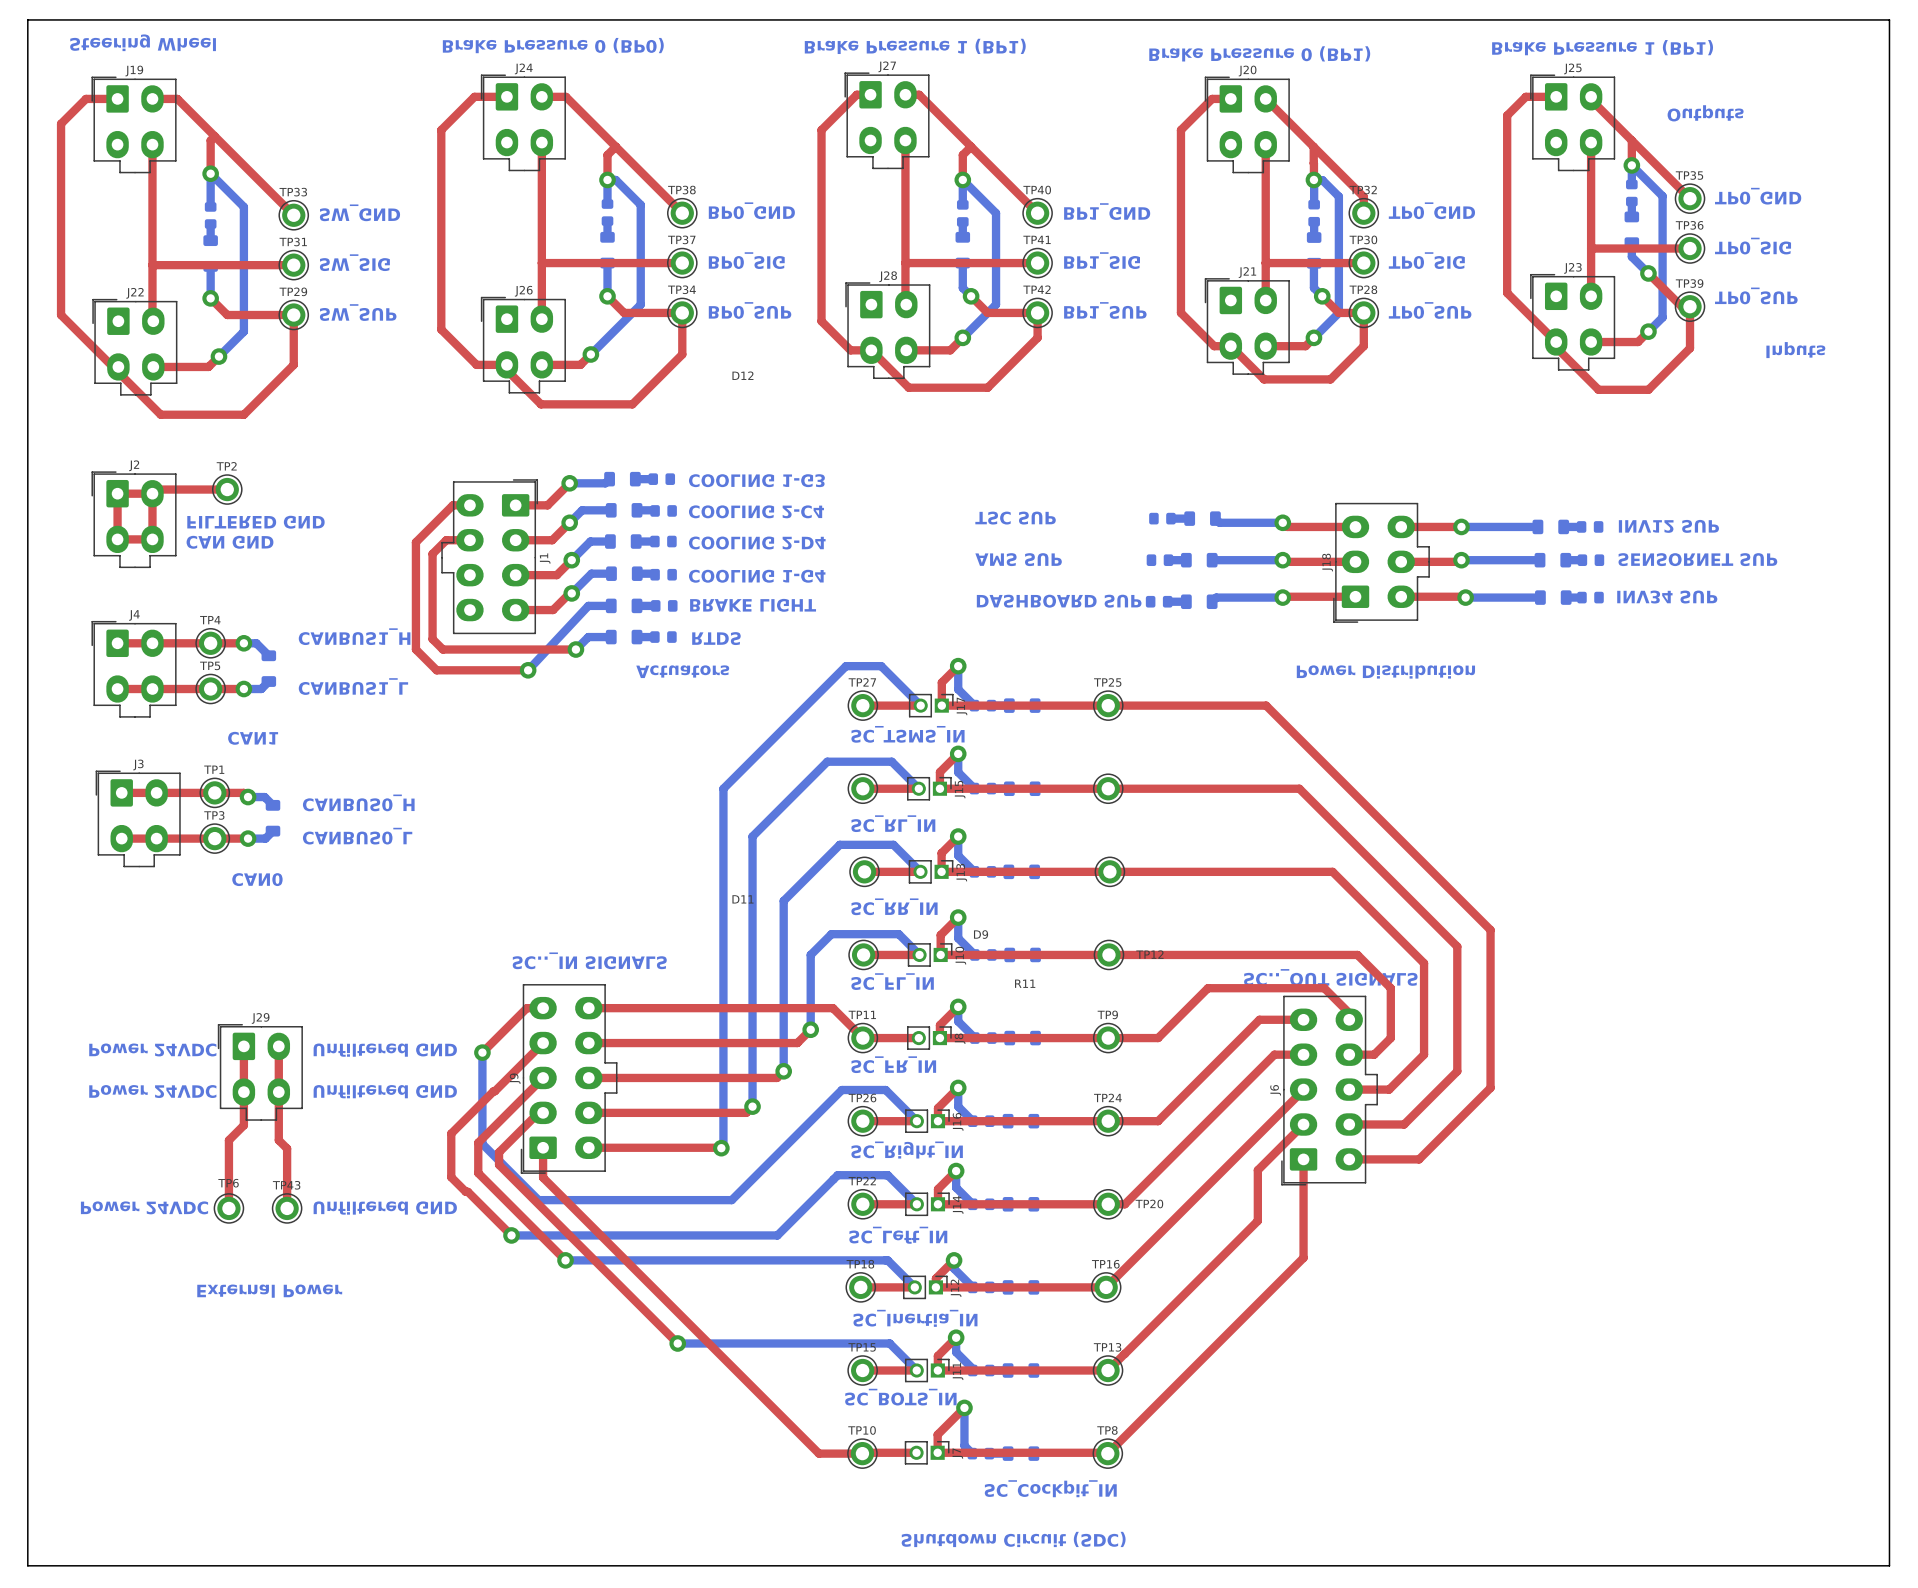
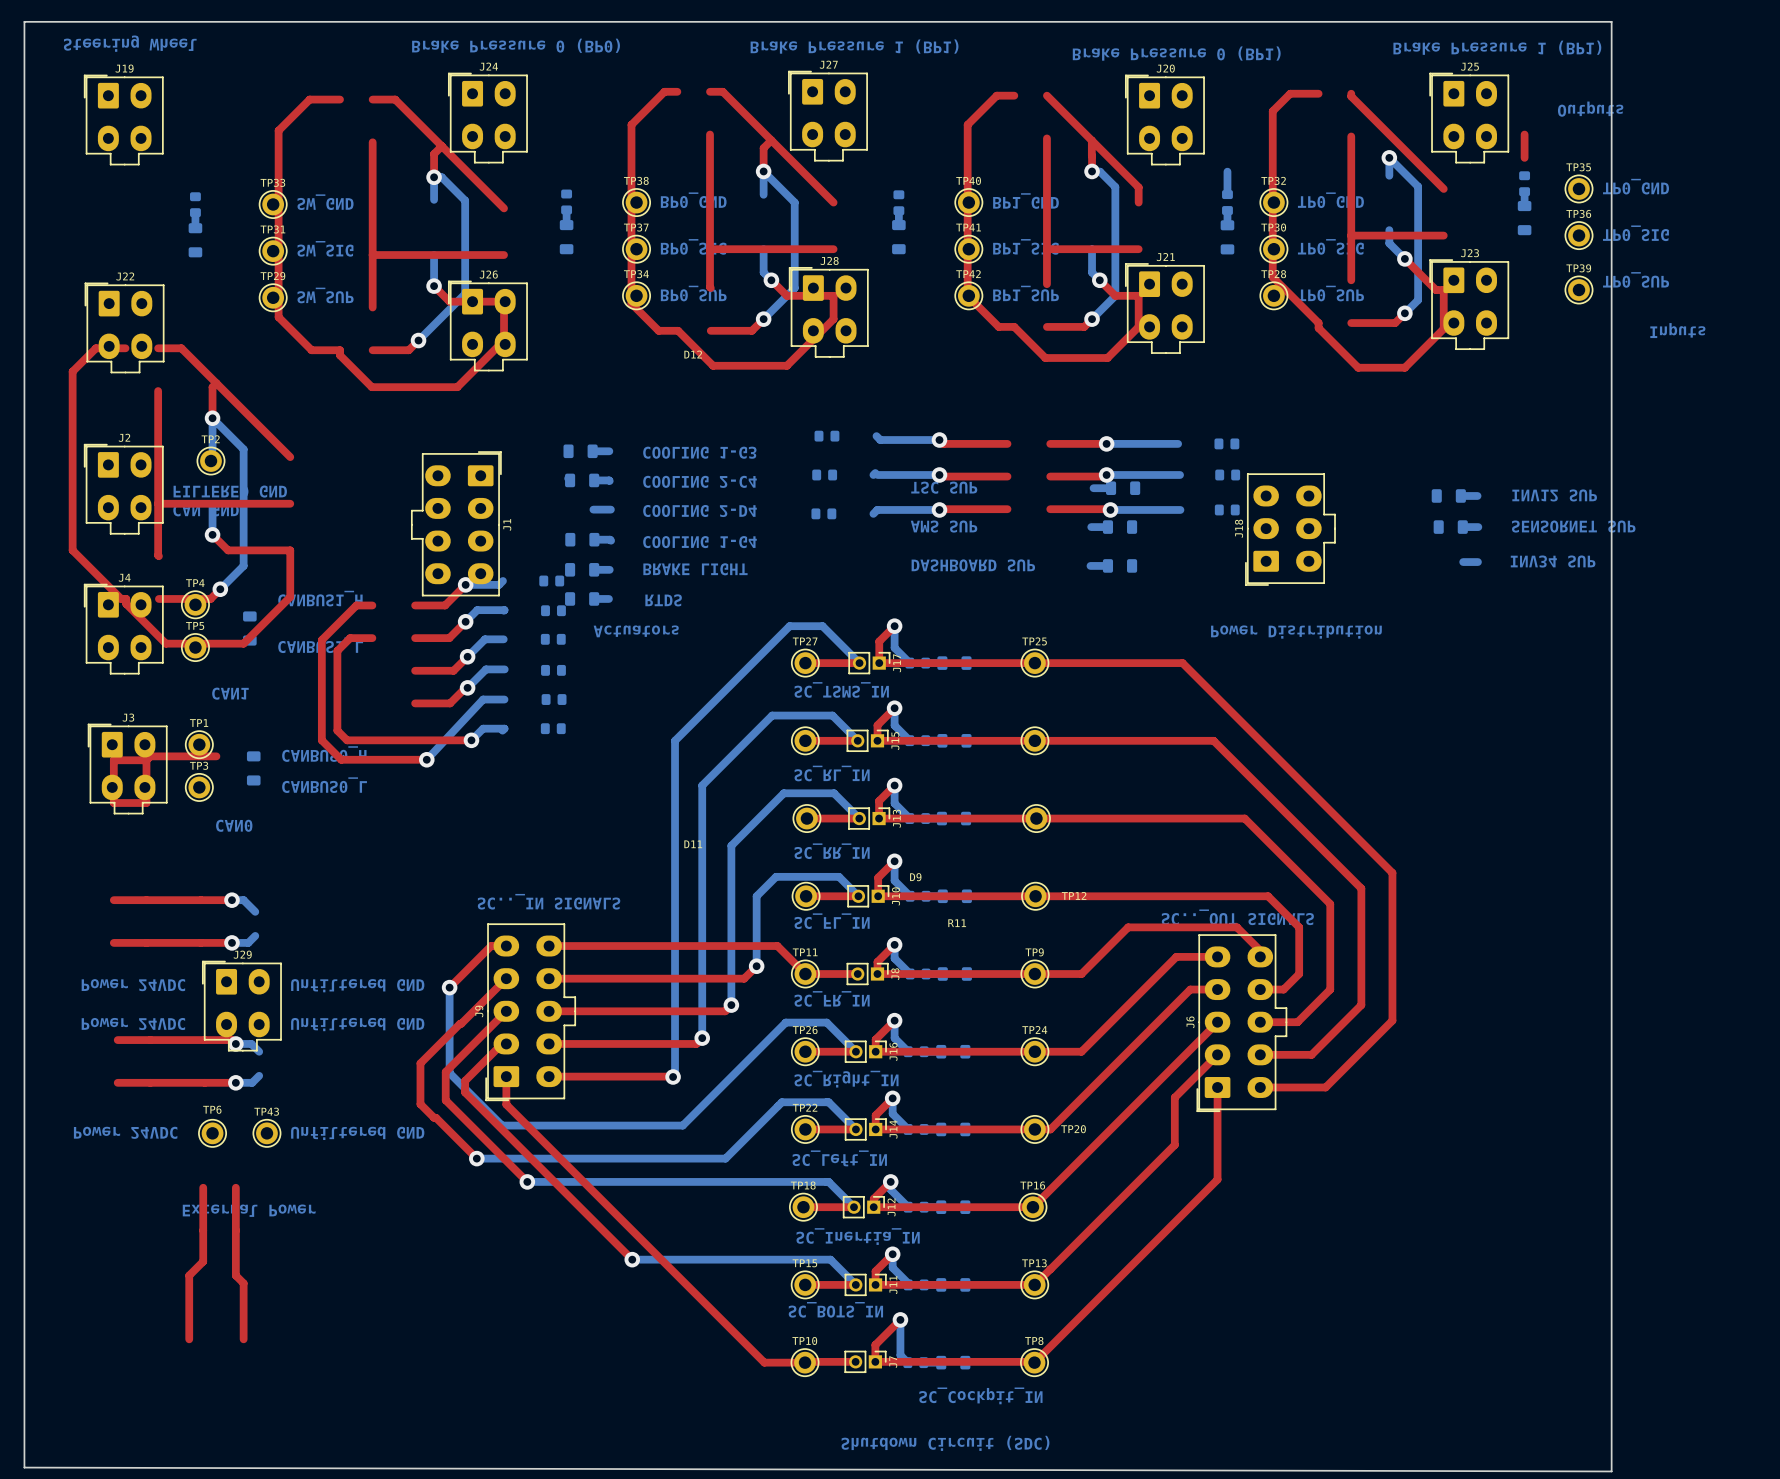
board edge: (1724, 19) (1889, 19) (1889, 1565) (27, 1565) -> (1611, 21) (1611, 1471) (24, 1467)
top track: (870, 94) (856, 94) (821, 130) (821, 321) (850, 350) (871, 350) (908, 387) (987, 387) (1037, 337) (1037, 312) (987, 312) (971, 296) -> (677, 91) (664, 91) (631, 124) (631, 303) (658, 330) (678, 330) (713, 365) (786, 365) (833, 319) (833, 295) (786, 295) (771, 280)
top track: (905, 94) (919, 94) (1037, 213) -> (710, 91) (722, 91) (833, 202)
top track: (506, 96) (474, 96) (441, 130) (441, 329) (476, 364) (506, 364) (506, 370) (541, 404) (632, 404) (682, 354) (682, 312) (624, 312) (607, 296) -> (340, 99) (309, 99) (278, 130) (278, 317) (311, 350) (340, 350) (340, 355) (371, 387) (457, 387) (504, 340) (504, 301) (449, 301) (434, 286)
top track: (541, 96) (565, 96) (682, 213) -> (372, 99) (395, 99) (504, 208)
top track: (1556, 96) (1525, 96) (1507, 115) (1507, 292) (1556, 342) (1556, 347) (1598, 389) (1648, 389) (1690, 348) (1690, 306) (1681, 306) (1648, 273) -> (1318, 93) (1290, 93) (1272, 111) (1272, 277) (1318, 323) (1318, 328) (1358, 367) (1404, 367) (1443, 328) (1443, 290) (1435, 290) (1404, 258)
top track: (1591, 96) (1591, 99) (1690, 198) -> (1351, 93) (1351, 96) (1443, 188)
top track: (117, 98) (85, 98) (61, 123) (61, 315) (113, 366) (118, 366) (118, 372) (160, 414) (243, 414) (293, 364) (293, 315) (227, 315) (210, 298) -> none
top track: (152, 98) (177, 98) (293, 215) -> none
top track: (1230, 98) (1212, 98) (1180, 130) (1180, 312) (1214, 346) (1230, 346) (1264, 379) (1330, 379) (1363, 346) (1363, 312) (1338, 312) (1322, 296) -> (1014, 95) (996, 95) (967, 124) (967, 295) (998, 326) (1014, 326) (1045, 358) (1107, 358) (1138, 326) (1138, 295) (1115, 295) (1099, 280)
top track: (1265, 98) (1363, 196) (1363, 213) -> (1046, 95) (1138, 187) (1138, 202)
top track: (214, 136) (210, 140) (210, 173) -> none
top track: (905, 140) (906, 304) -> (710, 134) (710, 288)
top track: (541, 142) (541, 319) -> (372, 142) (372, 307)
top track: (1591, 142) (1591, 296) -> (1351, 136) (1351, 280)
top track: (152, 144) (153, 321) -> none
top track: (1265, 144) (1265, 300) -> (1046, 138) (1046, 284)
top track: (615, 146) (607, 155) (607, 179) -> (441, 146) (434, 153) (434, 177)
top track: (971, 146) (962, 155) (962, 179) -> (771, 140) (763, 148) (763, 171)
top track: (1313, 146) (1313, 179) -> (1091, 140) (1092, 171)
via: none -> (1389, 157)
via: (1631, 165) -> none
via: (210, 173) -> none
via: (607, 179) -> none
via: none -> (763, 171)
via: (962, 179) -> none
via: none -> (1092, 171)
bottom track: (1313, 179) (1322, 180) (1338, 196) (1338, 312) (1313, 337) -> (1092, 171) (1100, 171) (1115, 187) (1115, 295) (1092, 319)
via: (1313, 179) -> none
bottom track: (1631, 184) (1631, 165) (1662, 196) (1662, 317) (1648, 331) -> (1389, 175) (1389, 157) (1418, 186) (1418, 300) (1404, 313)
via: none -> (434, 177)
bottom track: (607, 204) (607, 179) (615, 179) (640, 204) (640, 304) (590, 354) -> (434, 199) (434, 177) (441, 177) (465, 200) (465, 293) (418, 340)
bottom track: (962, 204) (962, 179) (996, 213) (996, 304) (962, 337) -> (763, 194) (763, 171) (794, 202) (794, 288) (763, 319)
bottom track: (210, 206) (210, 173) (243, 206) (243, 331) (218, 356) -> none
bottom track: (1631, 242) (1631, 256) (1648, 273) -> (1389, 230) (1389, 243) (1404, 258)
top track: (1591, 248) (1690, 248) -> (1351, 235) (1443, 235)
top track: (541, 263) (682, 263) -> (372, 255) (504, 255)
bottom track: (607, 263) (607, 296) -> (434, 255) (434, 286)
top track: (905, 263) (1037, 263) -> (710, 249) (833, 249)
bottom track: (962, 263) (962, 288) (971, 296) -> (763, 249) (763, 272) (771, 280)
top track: (1265, 263) (1363, 263) -> (1046, 249) (1138, 249)
bottom track: (1313, 263) (1313, 288) (1322, 296) -> (1092, 249) (1092, 272) (1099, 280)
top track: (152, 265) (293, 265) -> none
bottom track: (210, 266) (210, 298) -> none
via: none -> (1404, 258)
via: (1648, 273) -> none
via: (607, 296) -> none
via: none -> (771, 280)
via: (971, 296) -> none
via: none -> (1099, 280)
via: (1322, 296) -> none
via: (210, 298) -> none
via: none -> (434, 286)
via: none -> (1404, 313)
top track: (1648, 331) (1638, 342) (1591, 342) -> (1404, 313) (1395, 323) (1351, 323)
via: (1648, 331) -> none
via: none -> (763, 319)
top track: (962, 337) (950, 350) (906, 350) -> (763, 319) (751, 330) (710, 330)
via: (962, 337) -> none
via: none -> (1092, 319)
top track: (1313, 337) (1305, 346) (1265, 346) -> (1092, 319) (1084, 326) (1046, 326)
via: (1313, 337) -> none
top track: (590, 354) (580, 364) (541, 364) -> (418, 340) (408, 350) (372, 350)
via: (590, 354) -> none
top track: (218, 356) (208, 366) (153, 366) -> none
via: (218, 356) -> none
via: none -> (418, 340)
top track: none -> (125, 348) (95, 348) (72, 371) (72, 550) (121, 598) (126, 598) (126, 604) (165, 643) (243, 643) (290, 597) (290, 550) (228, 550) (212, 534)
top track: none -> (158, 348) (181, 348) (290, 457)
top track: none -> (216, 383) (212, 387) (212, 418)
top track: none -> (158, 391) (158, 556)
via: none -> (212, 418)
part: none -> (826, 436)
bottom track: none -> (876, 436) (880, 440) (939, 440)
top track: none -> (939, 440) (943, 443) (1007, 443)
via: none -> (939, 440)
top track: none -> (1050, 443) (1106, 443)
bottom track: none -> (1106, 443) (1178, 443)
via: none -> (1106, 443)
part: none -> (1226, 443)
bottom track: none -> (212, 449) (212, 418) (243, 449) (243, 565) (220, 589)
bottom track: (609, 479) (605, 483) (569, 483) -> (502, 580) (499, 584) (465, 584)
part: (661, 479) -> none
top track: (569, 483) (547, 505) (515, 505) -> (465, 584) (445, 605) (415, 605)
via: (569, 483) -> none
top track: (227, 489) (156, 489) (152, 493) -> none
top track: (152, 493) (152, 539) (117, 539) (117, 493) (152, 493) -> none
bottom track: none -> (875, 473) (873, 474)
part: none -> (824, 474)
bottom track: none -> (877, 474) (939, 474)
top track: none -> (939, 474) (941, 476) (1007, 476)
via: none -> (939, 474)
bottom track: none -> (1106, 474) (1180, 474)
top track: none -> (1106, 474) (1105, 476) (1050, 476)
via: none -> (1106, 474)
part: none -> (1227, 474)
top track: (469, 505) (452, 505) (415, 542) (415, 649) (436, 670) (528, 670) -> (372, 605) (356, 605) (321, 640) (321, 740) (341, 759) (426, 759)
bottom track: (610, 510) (582, 510) (569, 522) -> (503, 610) (477, 610) (465, 621)
part: (663, 510) -> none
part: (1162, 518) -> none
bottom track: (1215, 518) (1219, 522) (1282, 522) -> none
top track: (569, 522) (552, 540) (515, 540) -> (465, 621) (449, 638) (415, 638)
via: (569, 522) -> none
top track: (1282, 522) (1286, 526) (1355, 526) -> none
via: (1282, 522) -> none
top track: (1401, 526) (1461, 526) -> none
bottom track: (1461, 526) (1537, 526) -> none
via: (1461, 526) -> none
part: (1590, 526) -> none
top track: none -> (158, 503) (290, 503)
bottom track: none -> (212, 504) (212, 534)
top track: (469, 540) (446, 540) (432, 553) (432, 639) (442, 649) (575, 649) -> (372, 638) (350, 638) (337, 650) (337, 730) (347, 740) (471, 740)
bottom track: (610, 541) (590, 541) (571, 560) -> (503, 639) (485, 639) (467, 656)
part: (623, 541) -> none
part: (663, 541) -> none
bottom track: none -> (939, 509) (877, 509) (873, 513)
via: none -> (939, 509)
top track: none -> (1007, 509) (939, 509)
top track: none -> (1050, 509) (1110, 509)
bottom track: none -> (1110, 509) (1180, 509)
via: none -> (1110, 509)
part: none -> (1227, 509)
part: none -> (823, 513)
top track: (571, 560) (556, 575) (515, 575) -> (467, 656) (453, 670) (415, 670)
via: (571, 560) -> none
part: (1159, 560) -> none
bottom track: (1216, 560) (1282, 560) -> none
top track: (1282, 560) (1284, 561) (1355, 561) -> none
via: (1282, 560) -> none
bottom track: (1461, 560) (1540, 560) -> none
top track: (1461, 560) (1459, 561) (1401, 561) -> none
via: (1461, 560) -> none
part: (1590, 560) -> none
via: none -> (212, 534)
bottom track: (611, 573) (591, 573) (571, 593) -> (504, 669) (486, 669) (467, 687)
part: (663, 574) -> none
top track: (571, 593) (553, 610) (515, 610) -> (467, 687) (450, 703) (415, 703)
via: (571, 593) -> none
top track: (1355, 596) (1282, 597) -> none
top track: (1401, 596) (1465, 597) -> none
bottom track: (1282, 597) (1216, 597) (1212, 601) -> none
via: (1282, 597) -> none
bottom track: (1465, 597) (1540, 597) -> none
via: (1465, 597) -> none
part: (1553, 597) -> none
part: (1590, 597) -> none
part: (1159, 601) -> none
bottom track: (611, 605) (588, 605) (528, 670) -> (504, 699) (483, 699) (426, 759)
part: (664, 605) -> none
part: none -> (551, 580)
via: none -> (465, 584)
top track: none -> (220, 589) (210, 598) (158, 598)
part: (663, 637) -> none
bottom track: (609, 639) (611, 637) (588, 637) (575, 649) -> (502, 730) (504, 728) (483, 728) (471, 740)
top track: (117, 643) (243, 643) -> none
bottom track: (243, 643) (256, 643) (268, 655) -> none
via position: (243, 643) -> (220, 589)
via: (575, 649) -> none
part: none -> (553, 610)
via: none -> (465, 621)
via: (528, 670) -> none
part: none -> (553, 639)
bottom track: (268, 681) (261, 689) (243, 689) -> none
top track: (117, 689) (243, 689) -> none
via: (243, 689) -> none
via: none -> (467, 656)
part: none -> (553, 670)
via: none -> (467, 687)
part: none -> (554, 699)
part: none -> (553, 728)
via: none -> (471, 740)
top track: (121, 792) (243, 792) (248, 797) -> none
bottom track: (248, 797) (264, 797) (272, 805) -> none
via: (248, 797) -> none
top track: none -> (216, 756) (150, 756) (146, 760)
via: none -> (426, 759)
top track: none -> (146, 760) (146, 803) (113, 803) (113, 760) (146, 760)
bottom track: (272, 831) (265, 838) (248, 838) -> (255, 935) (248, 942) (231, 942)
top track: (121, 838) (248, 838) -> (113, 900) (231, 900)
via: (248, 838) -> none
bottom track: none -> (231, 900) (243, 900) (255, 911)
via: none -> (231, 900)
top track: none -> (113, 942) (231, 942)
via: none -> (231, 942)
top track: (243, 1046) (243, 1125) (228, 1140) (228, 1208) -> none
top track: (278, 1046) (278, 1140) (287, 1148) (287, 1208) -> none
top track: none -> (117, 1040) (231, 1040) (235, 1043)
bottom track: none -> (235, 1043) (251, 1043) (259, 1051)
via: none -> (235, 1043)
bottom track: none -> (259, 1075) (252, 1082) (235, 1082)
top track: none -> (117, 1082) (235, 1082)
via: none -> (235, 1082)
top track: none -> (203, 1187) (203, 1261) (189, 1275) (189, 1339)
top track: none -> (235, 1187) (235, 1275) (243, 1283) (243, 1339)

